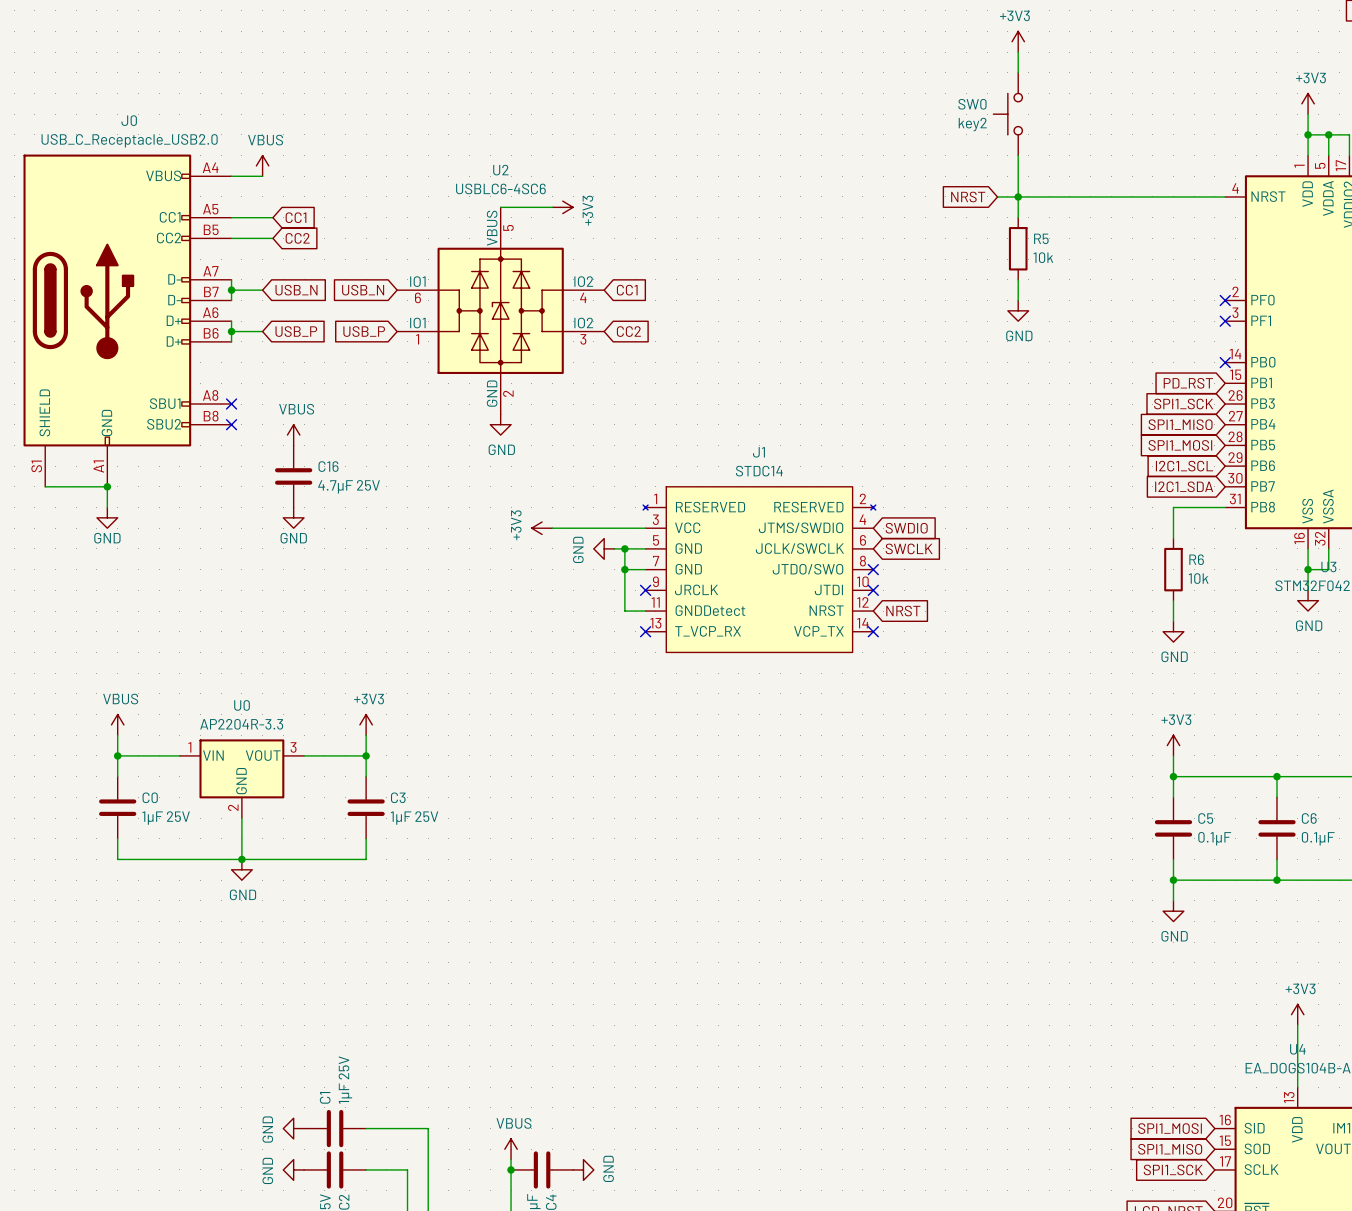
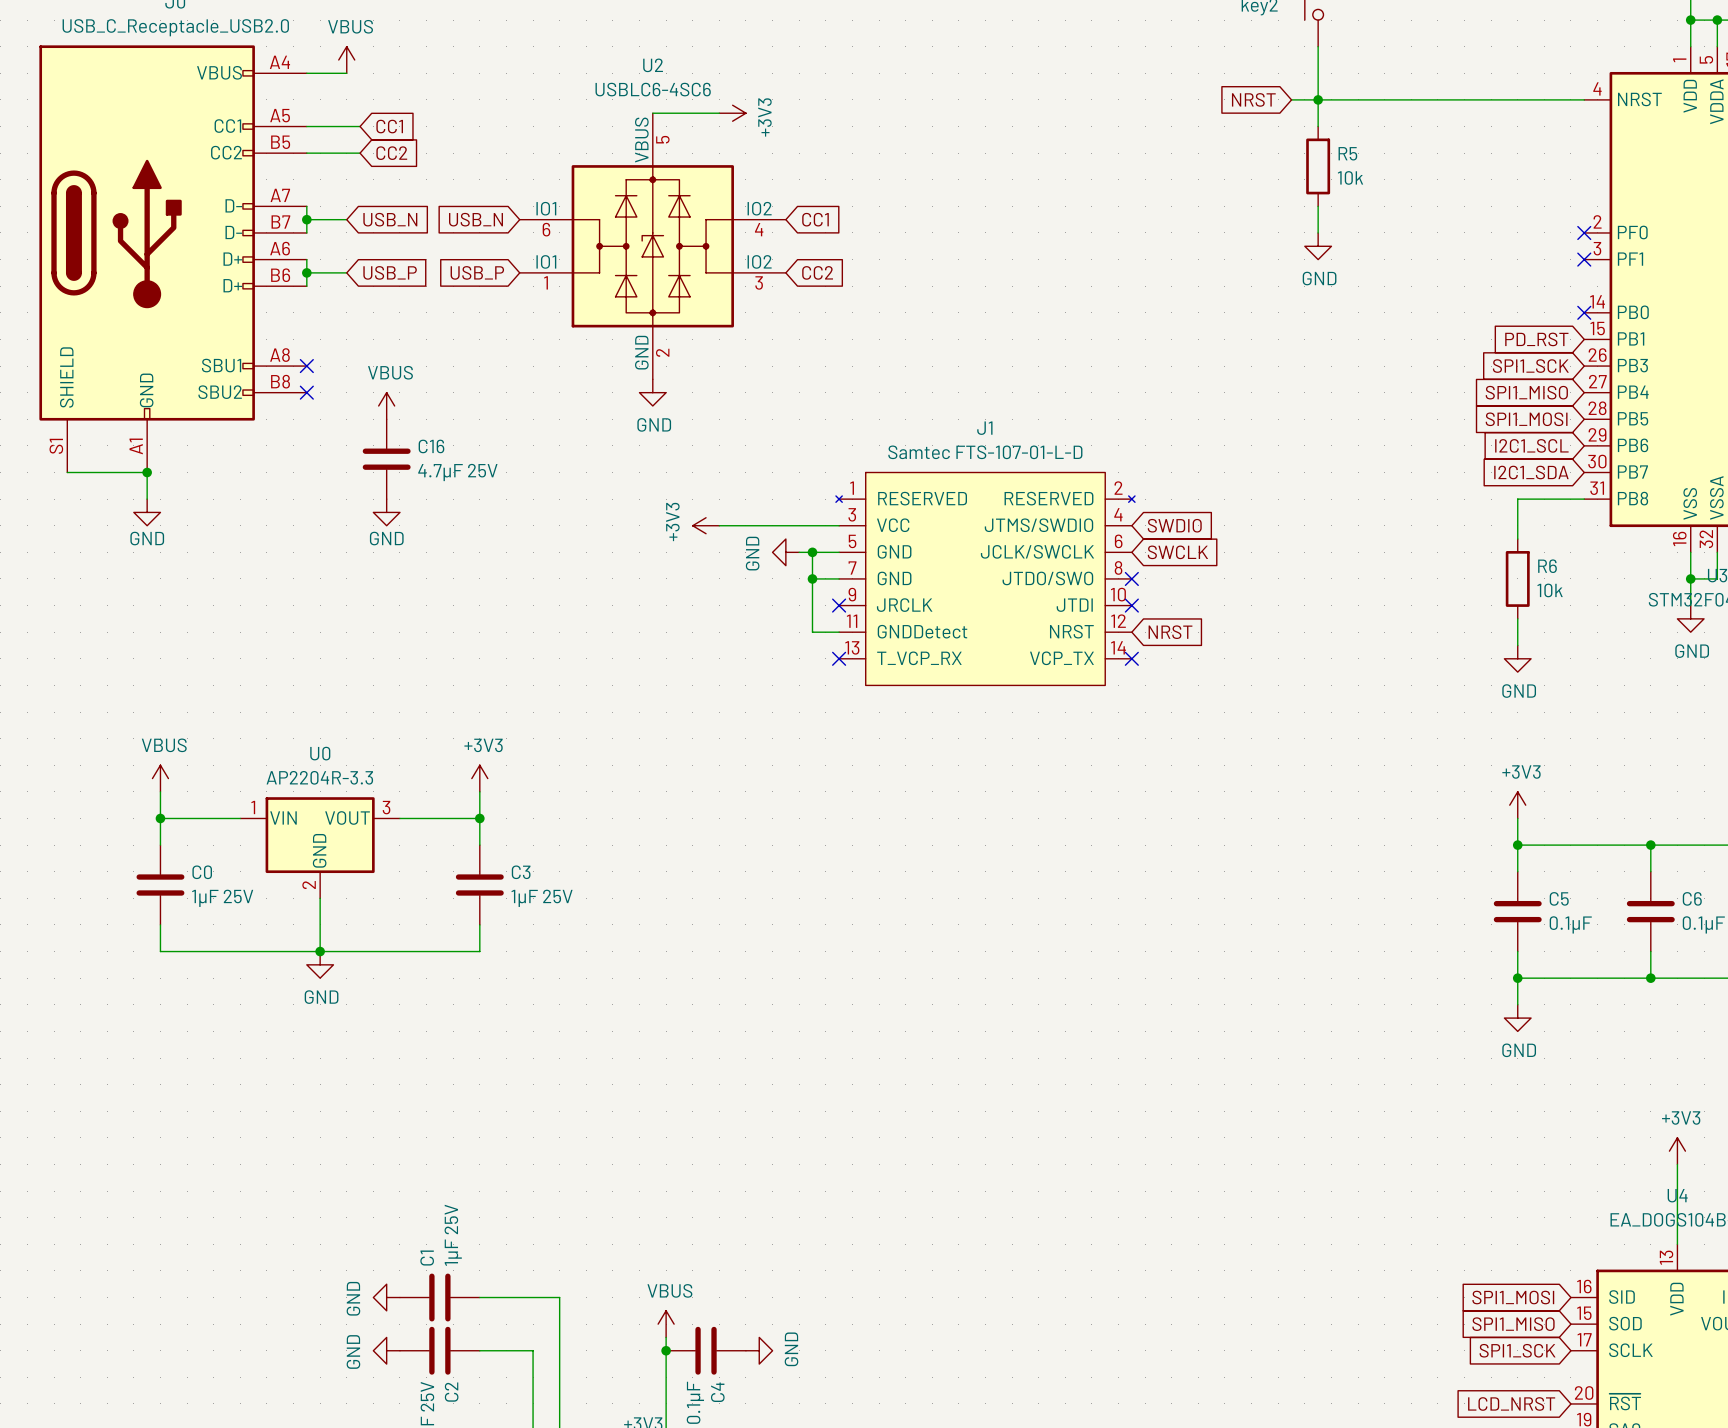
J1 value: STDC14 (759, 471) -> Samtec FTS-107-01-L-D (985, 452)

